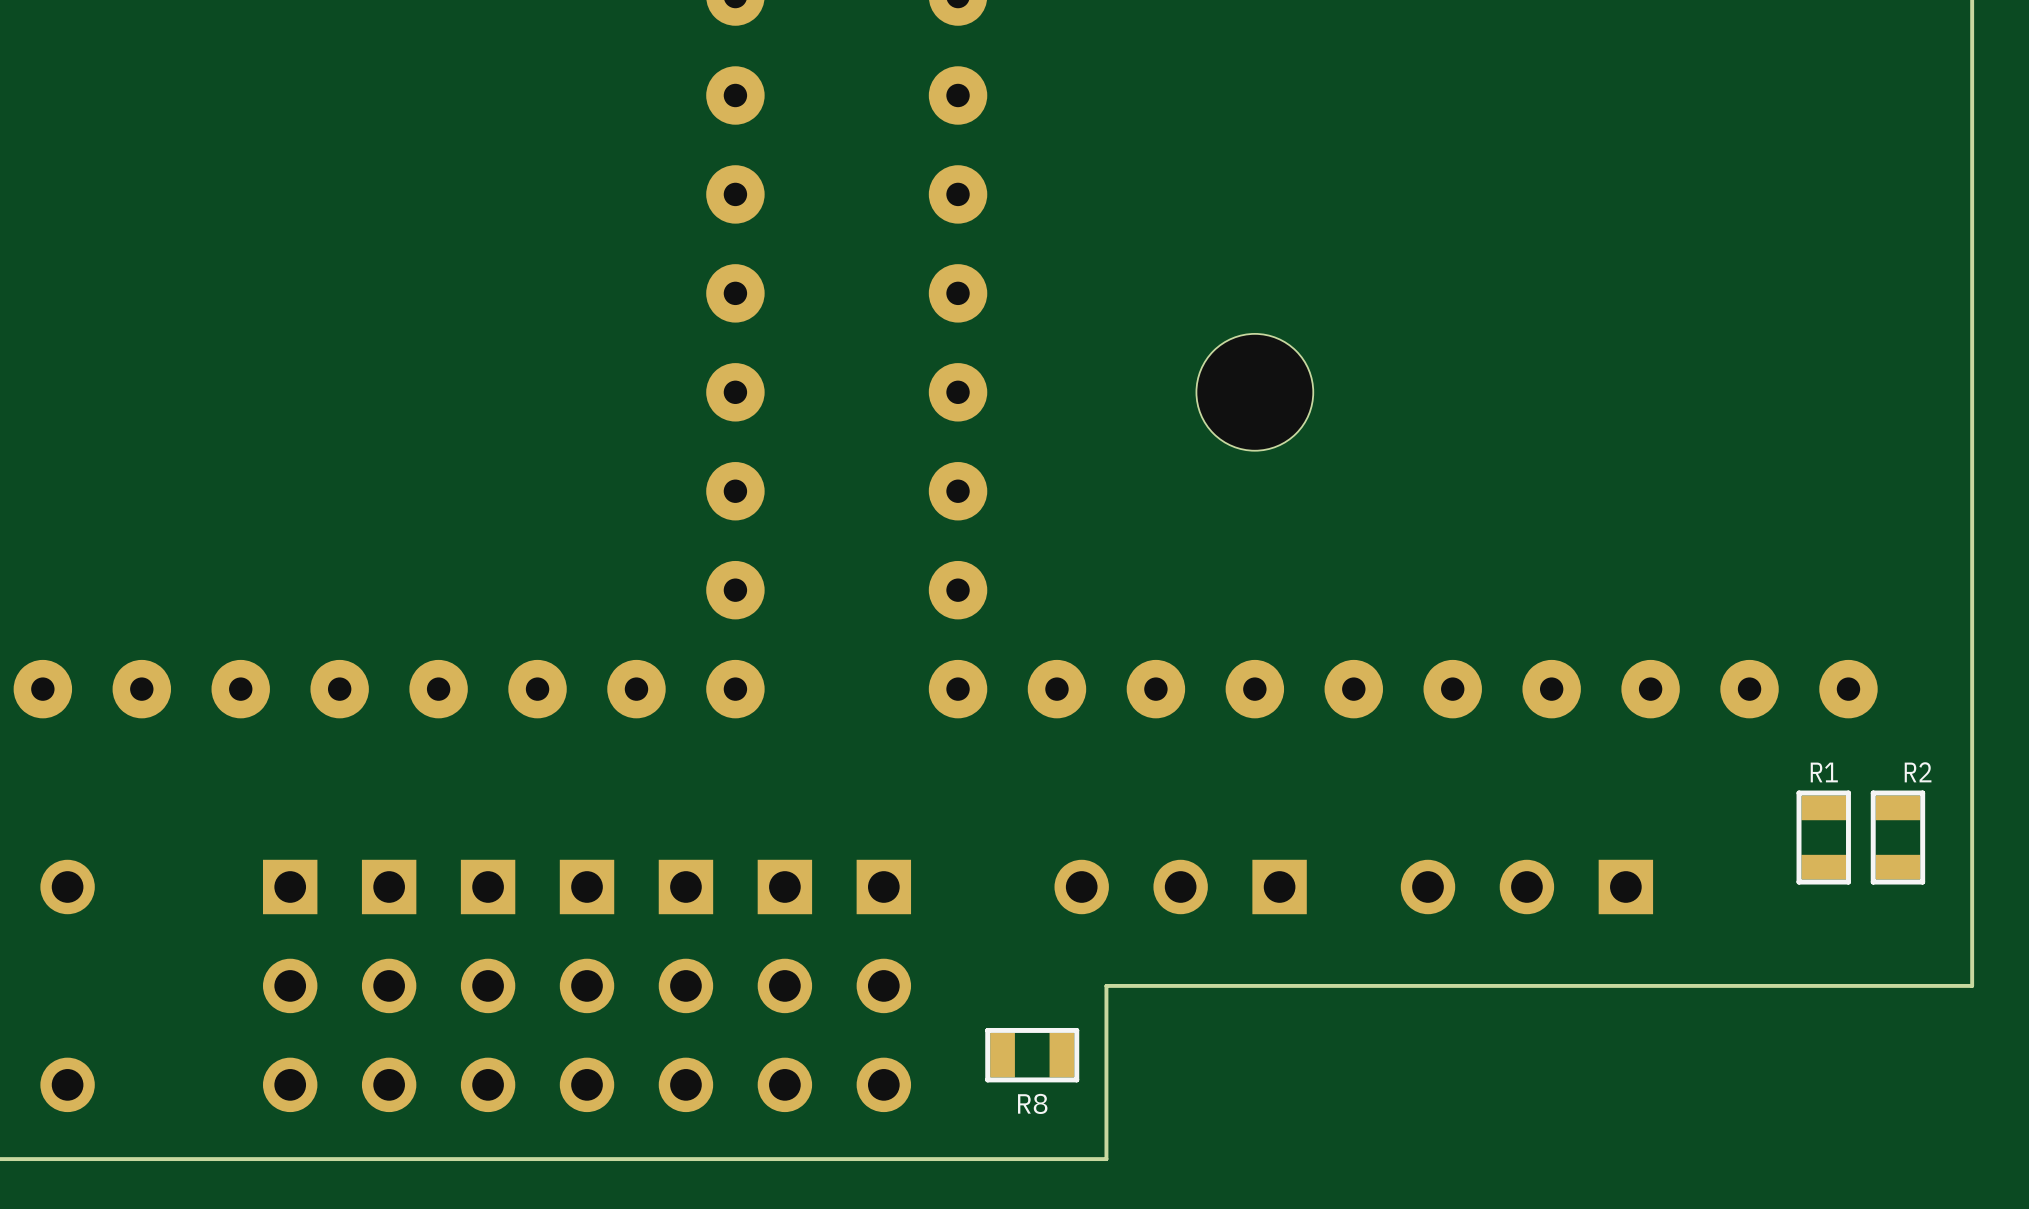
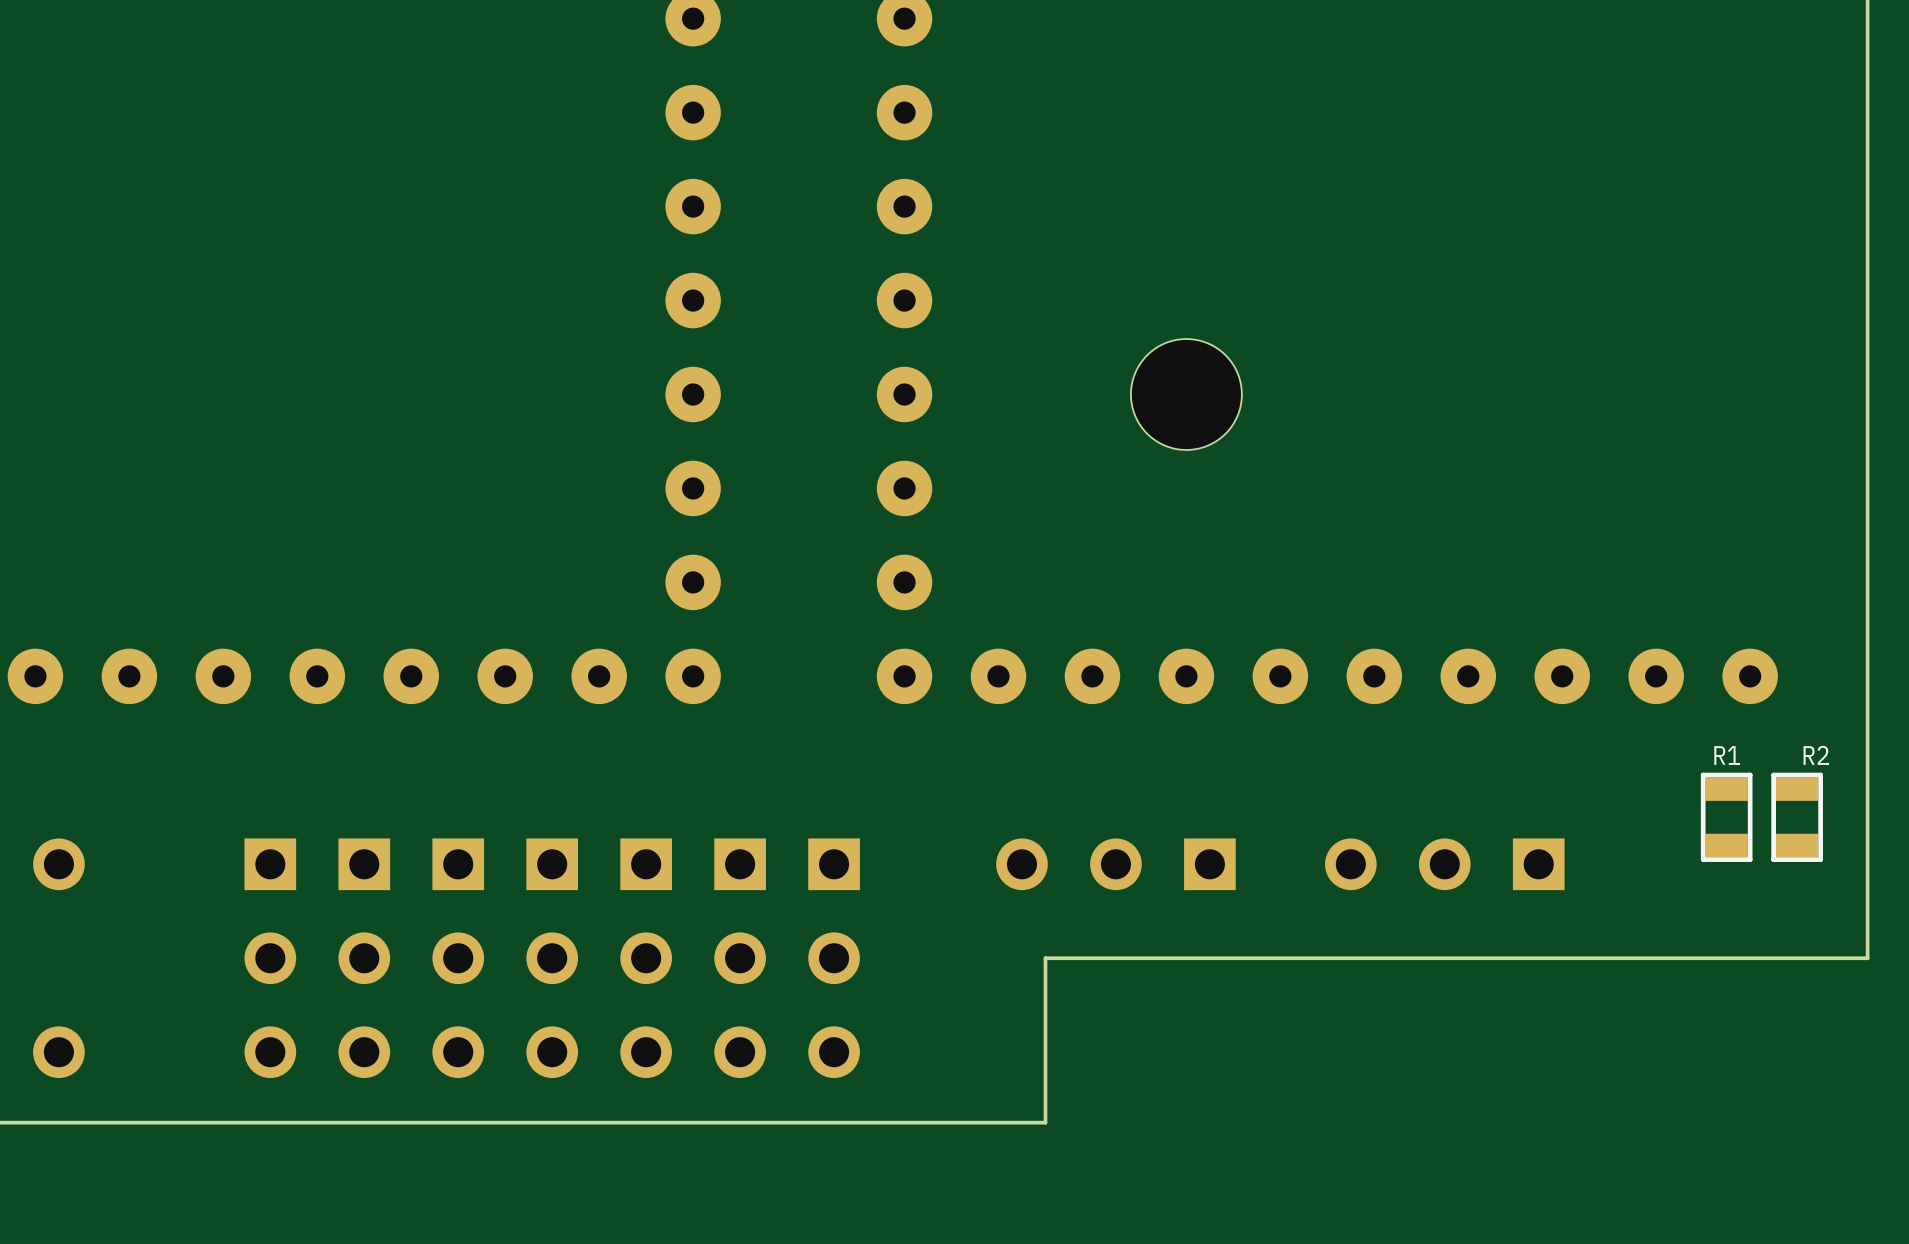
R8: (1032, 1055) -> none

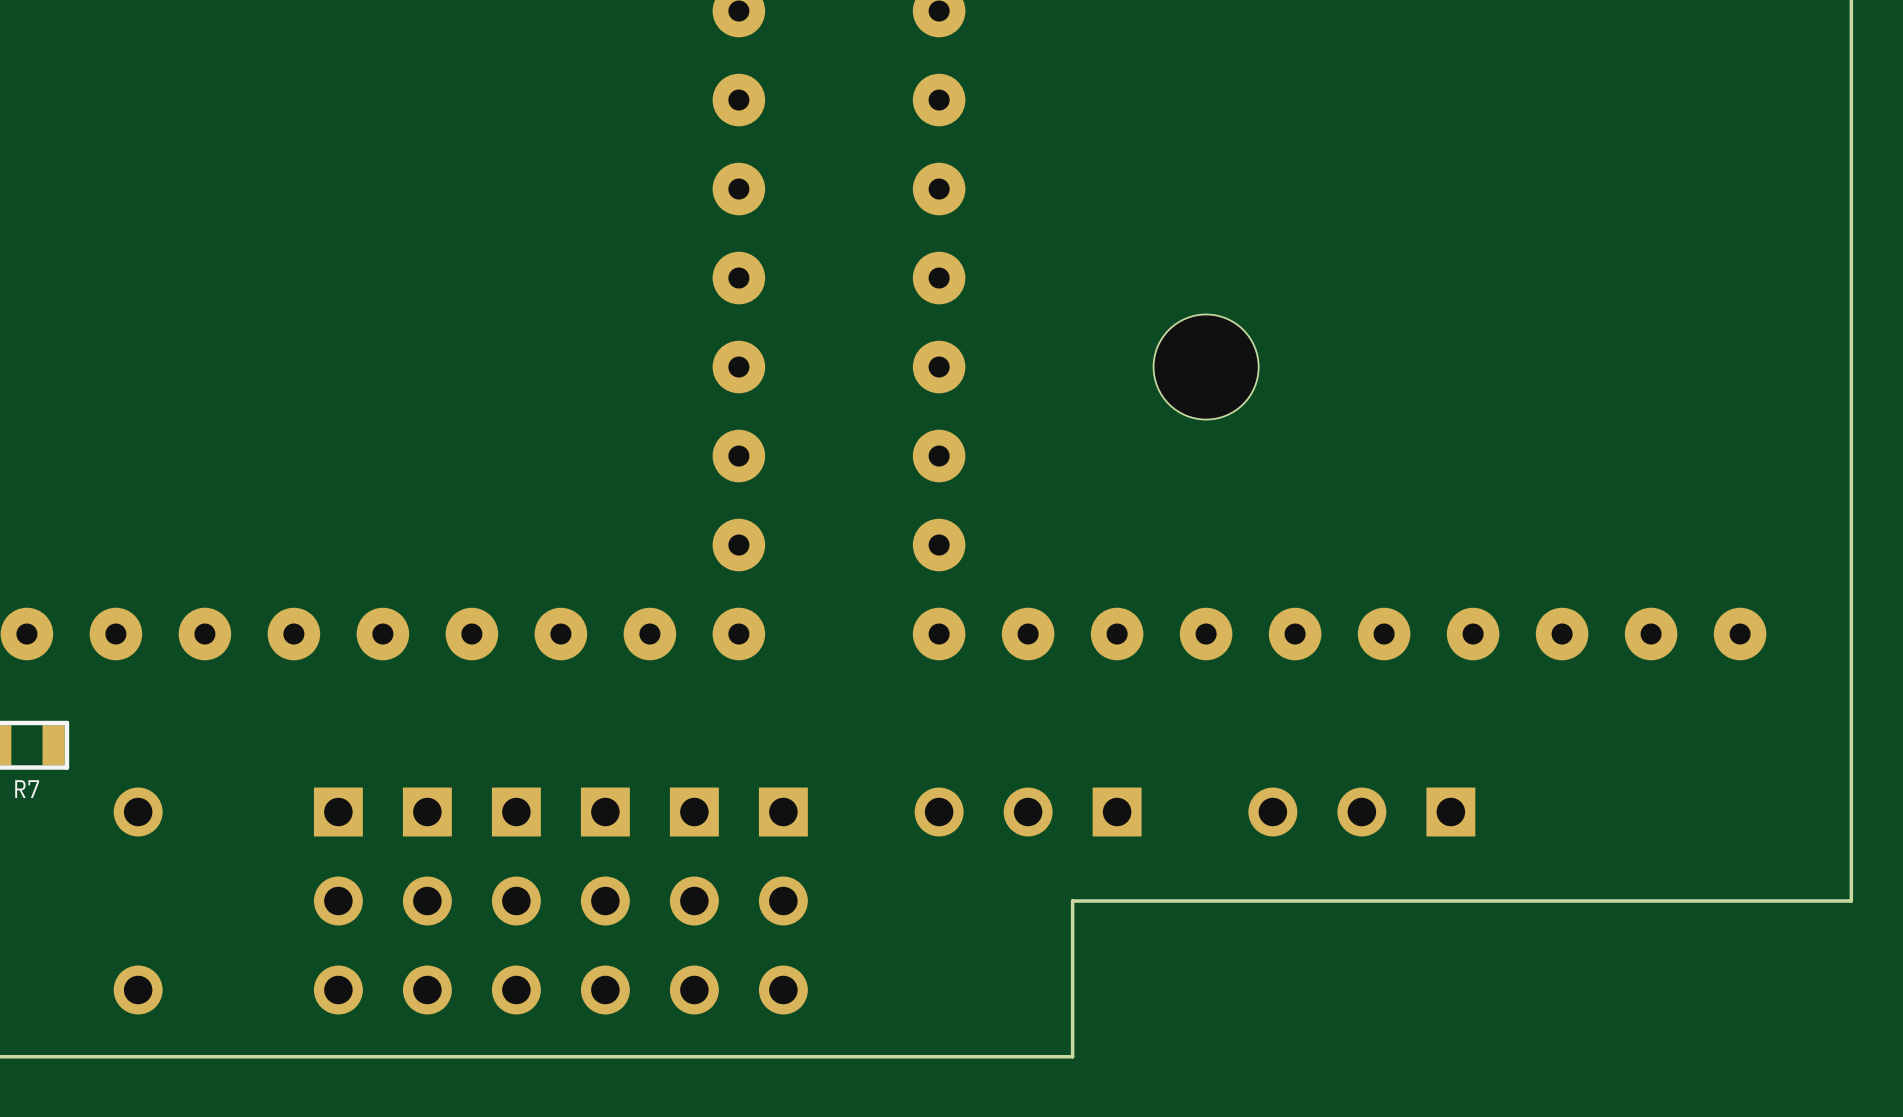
R1: (1726, 817) -> none
R2: (1797, 817) -> none
part: none -> (1028, 812)
part: (1115, 864) -> none
part position: (1444, 864) -> (1361, 812)
part: (834, 958) -> none

